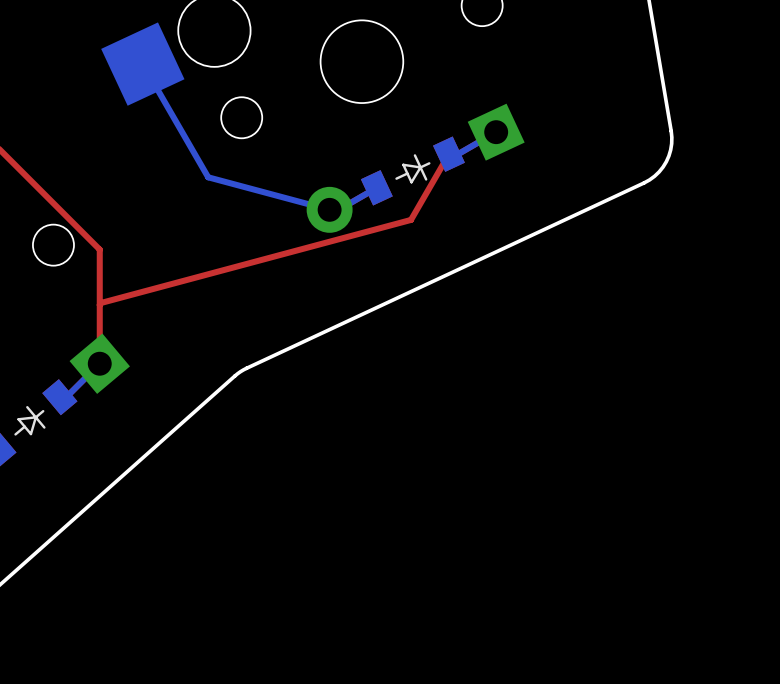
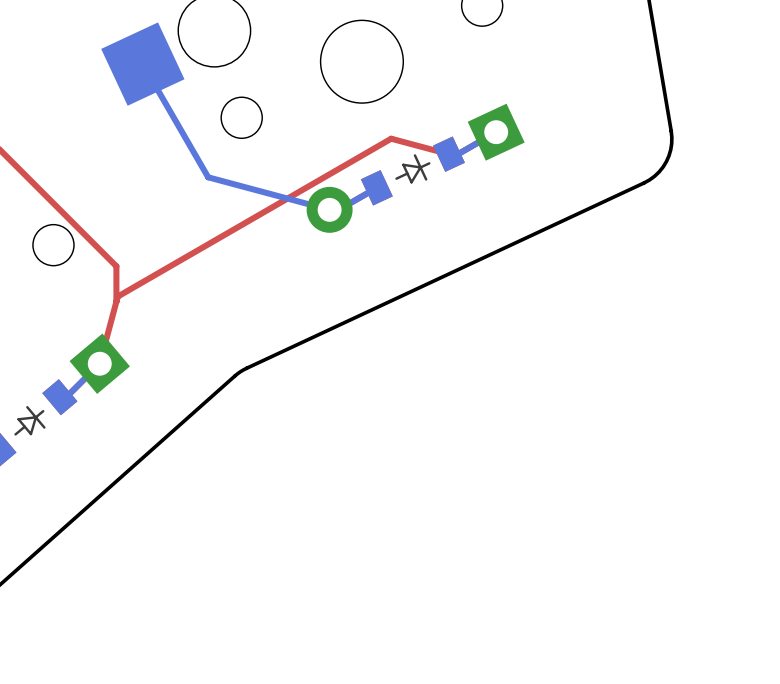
top track: (448, 154) (411, 219) (100, 303) (99, 304) -> (448, 154) (391, 138) (117, 296) (99, 363) (66, 397)
top track: (99, 249) (99, 363) (66, 397) -> (99, 249) (116, 266) (116, 301)

